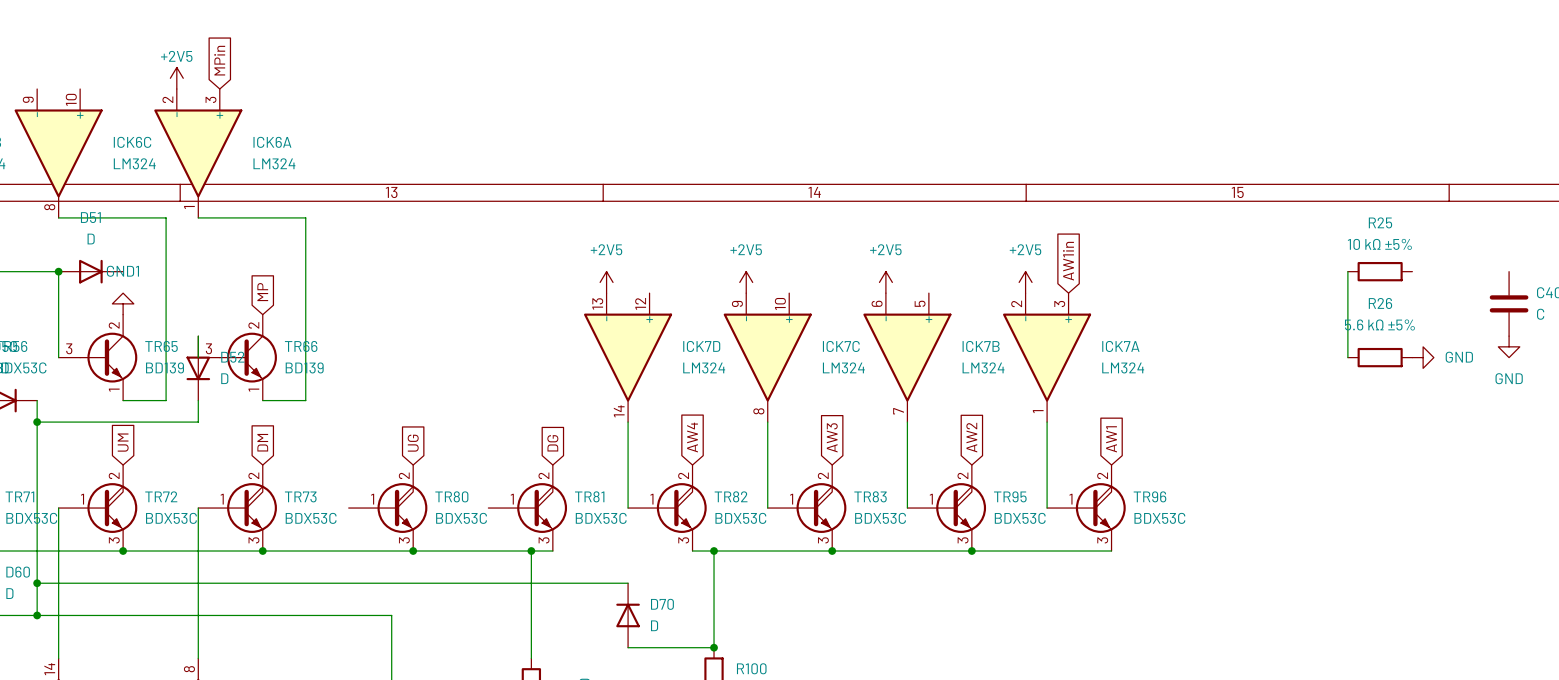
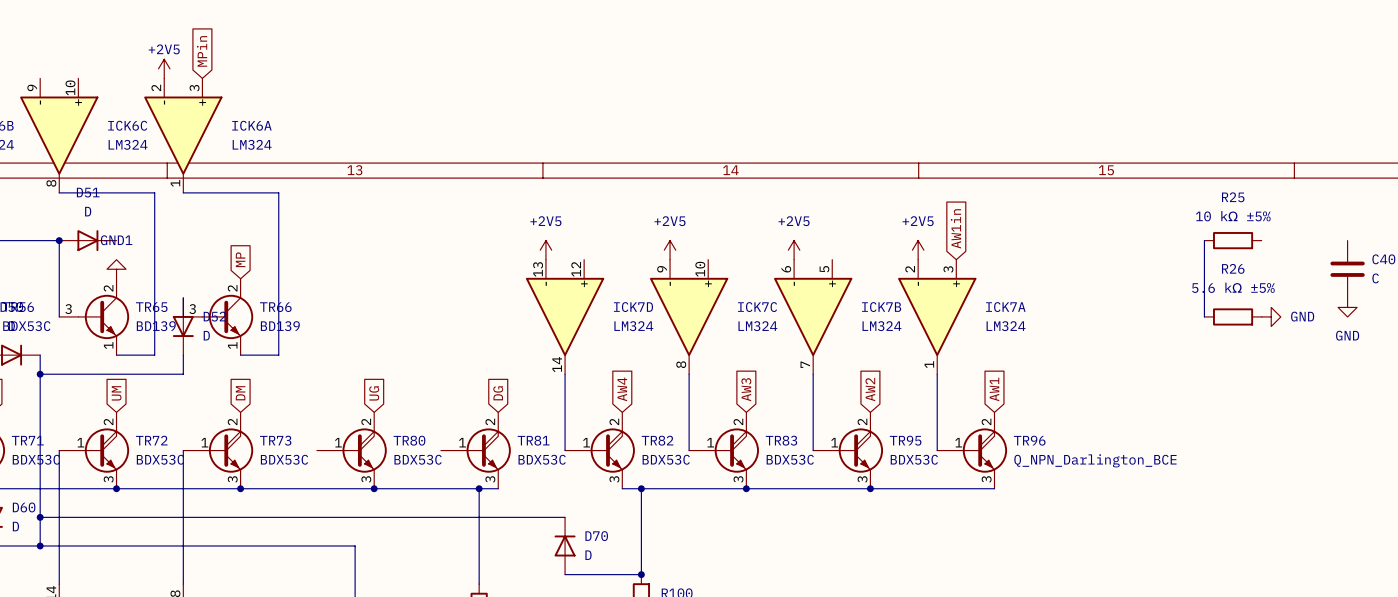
TR96 value: BDX53C (1159, 518) -> Q_NPN_Darlington_BCE (1095, 460)

